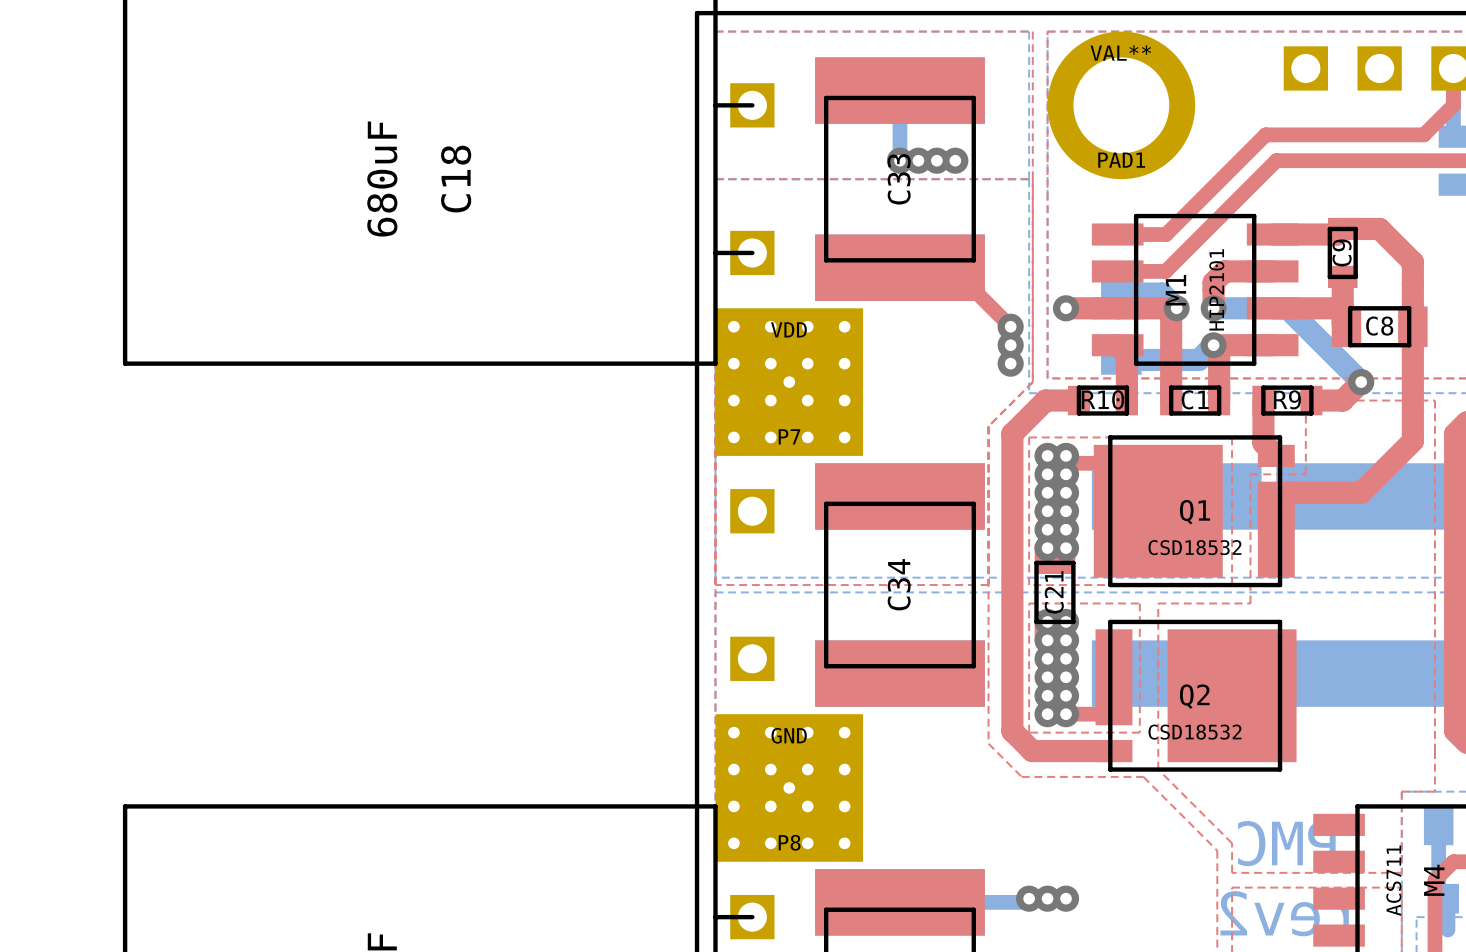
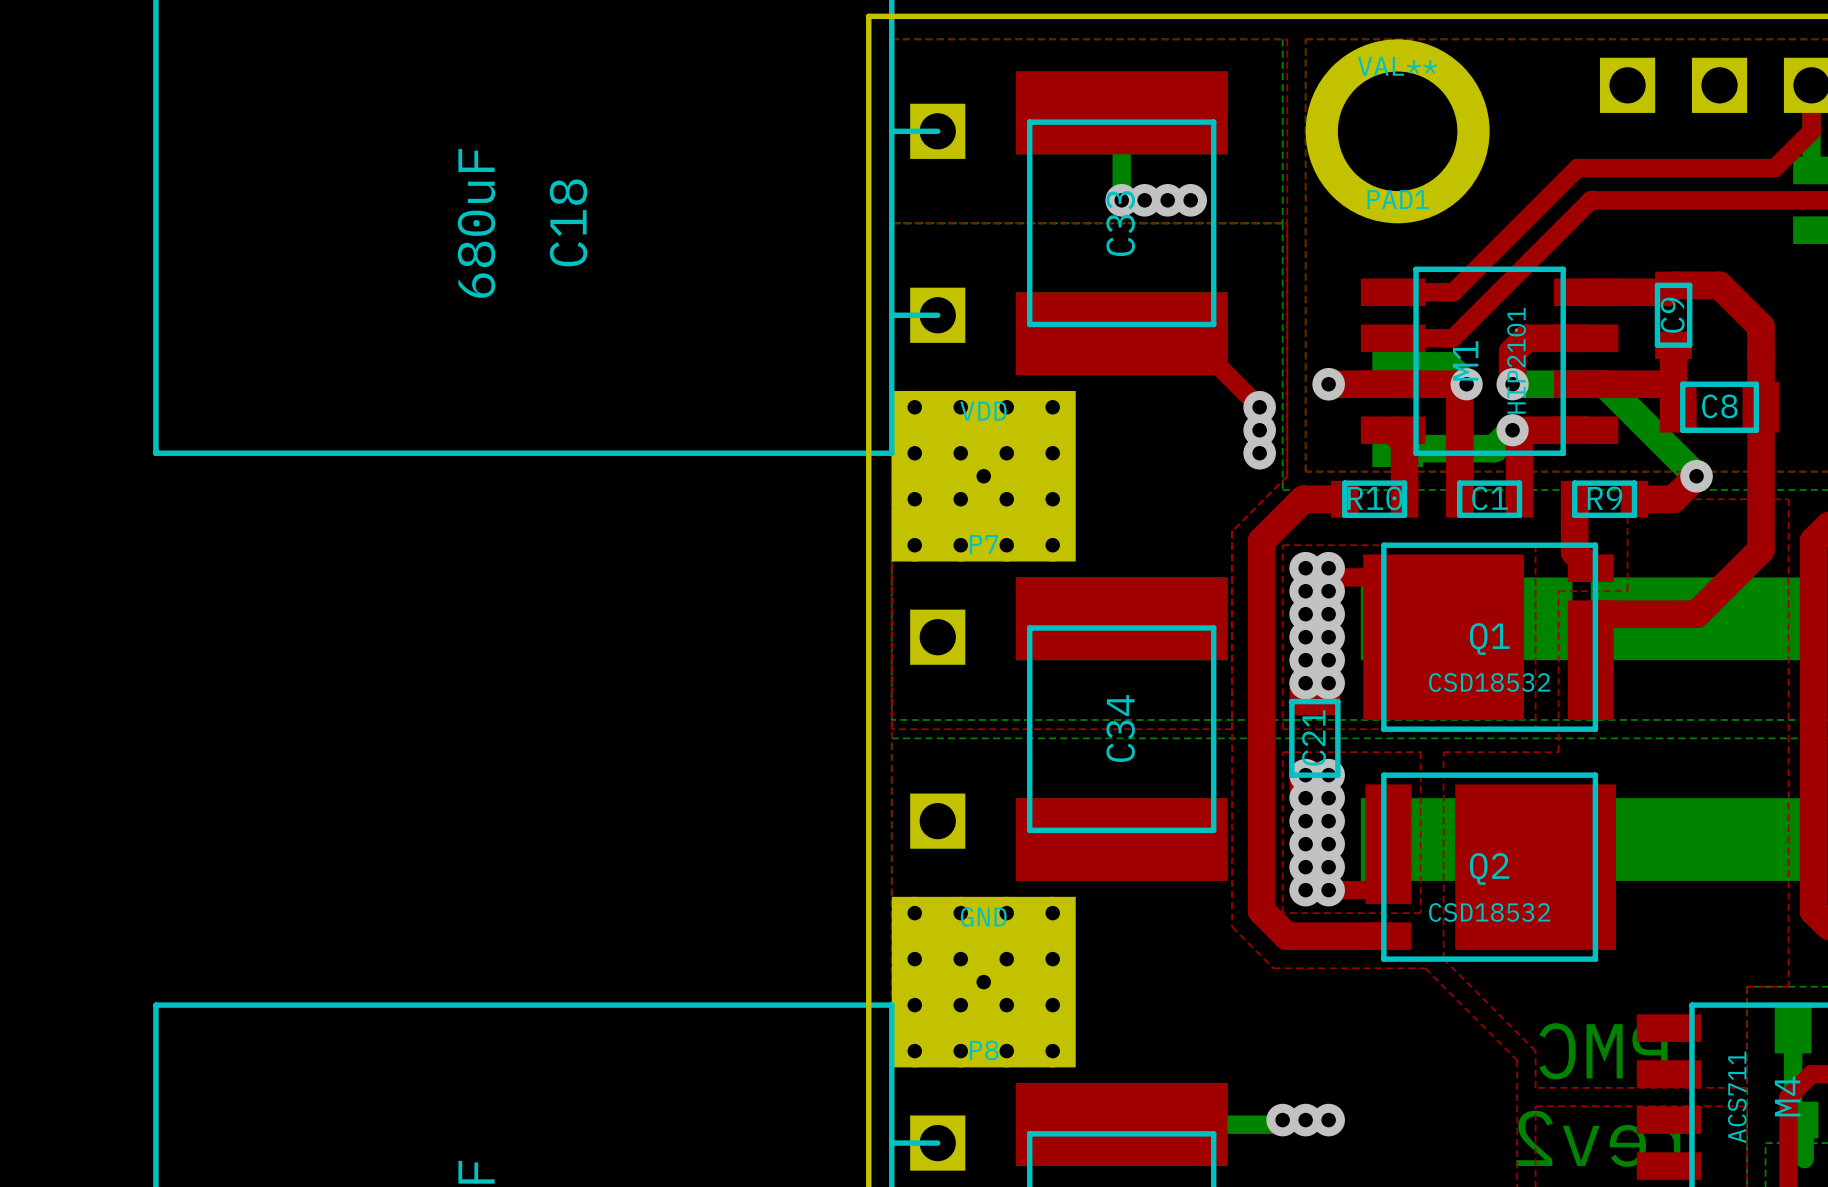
P7 footprint: [715, 308, 864, 456] -> [891, 390, 1076, 562]
P8 footprint: [715, 714, 864, 862] -> [891, 896, 1076, 1068]

